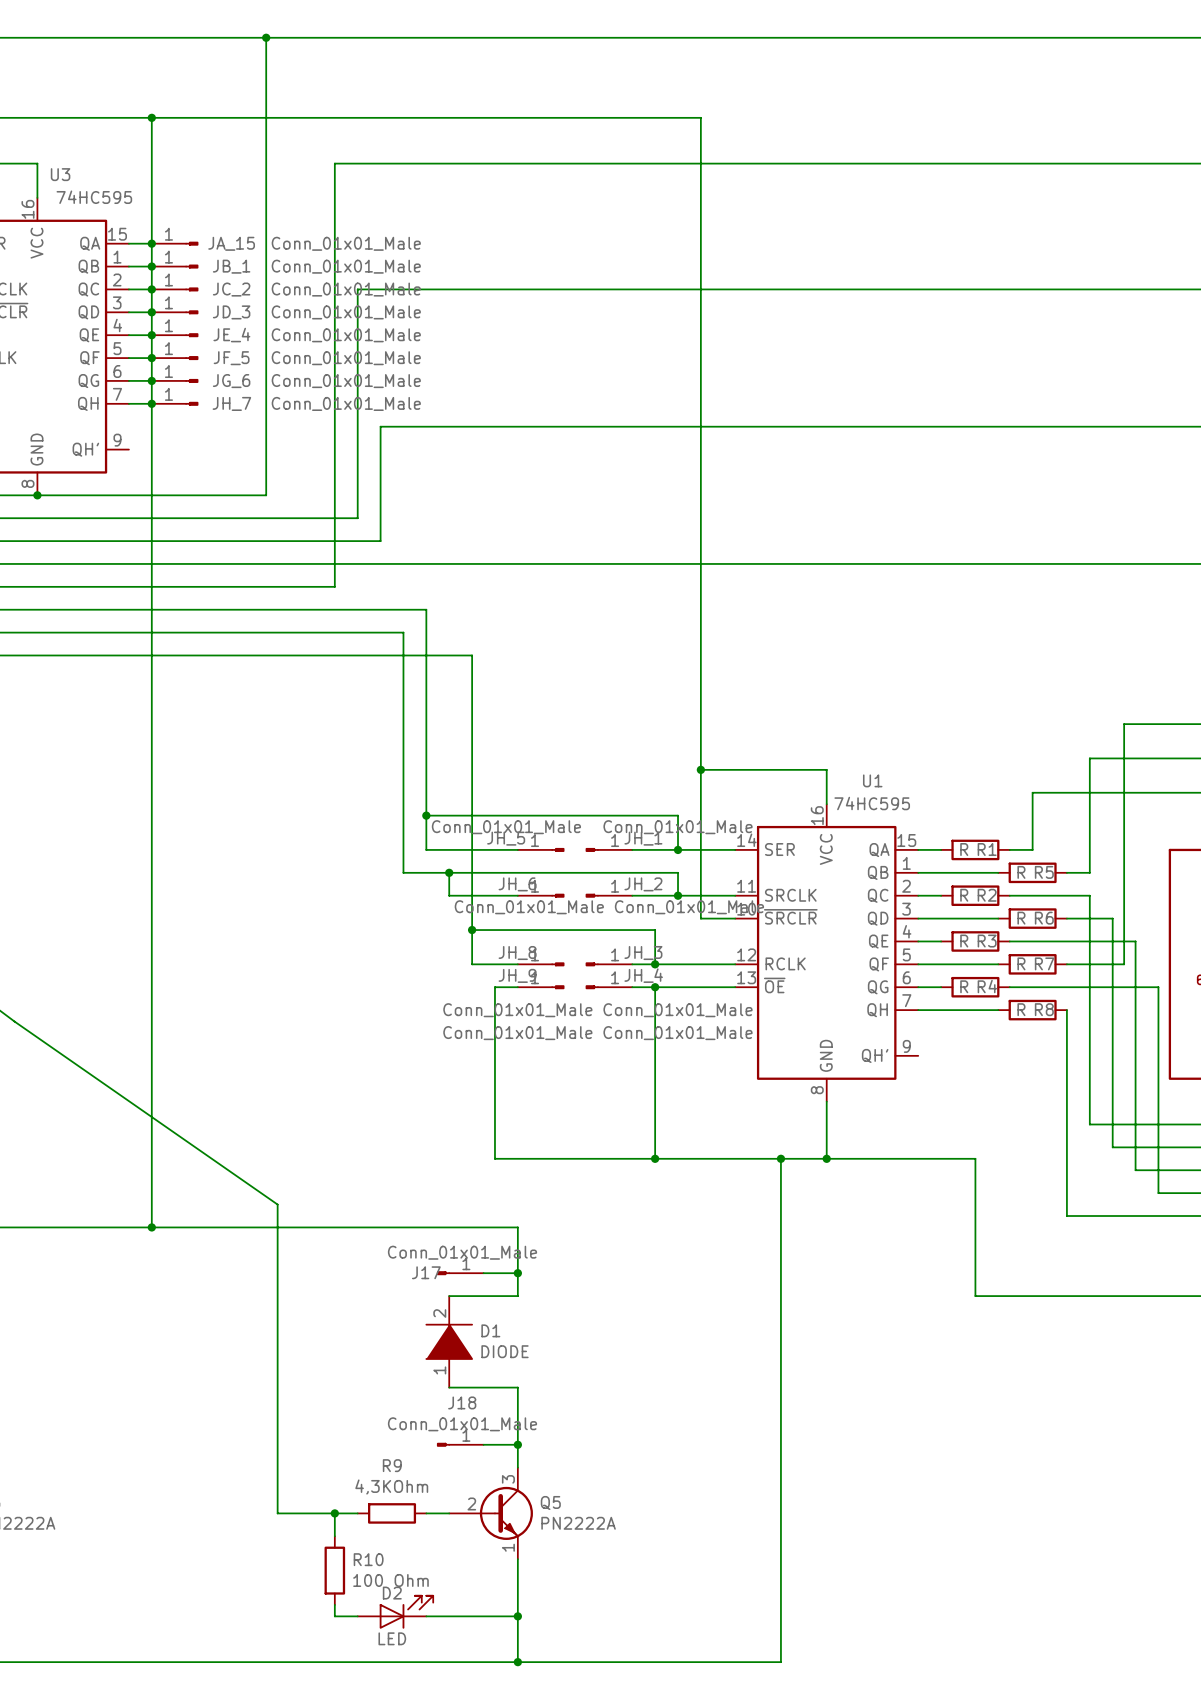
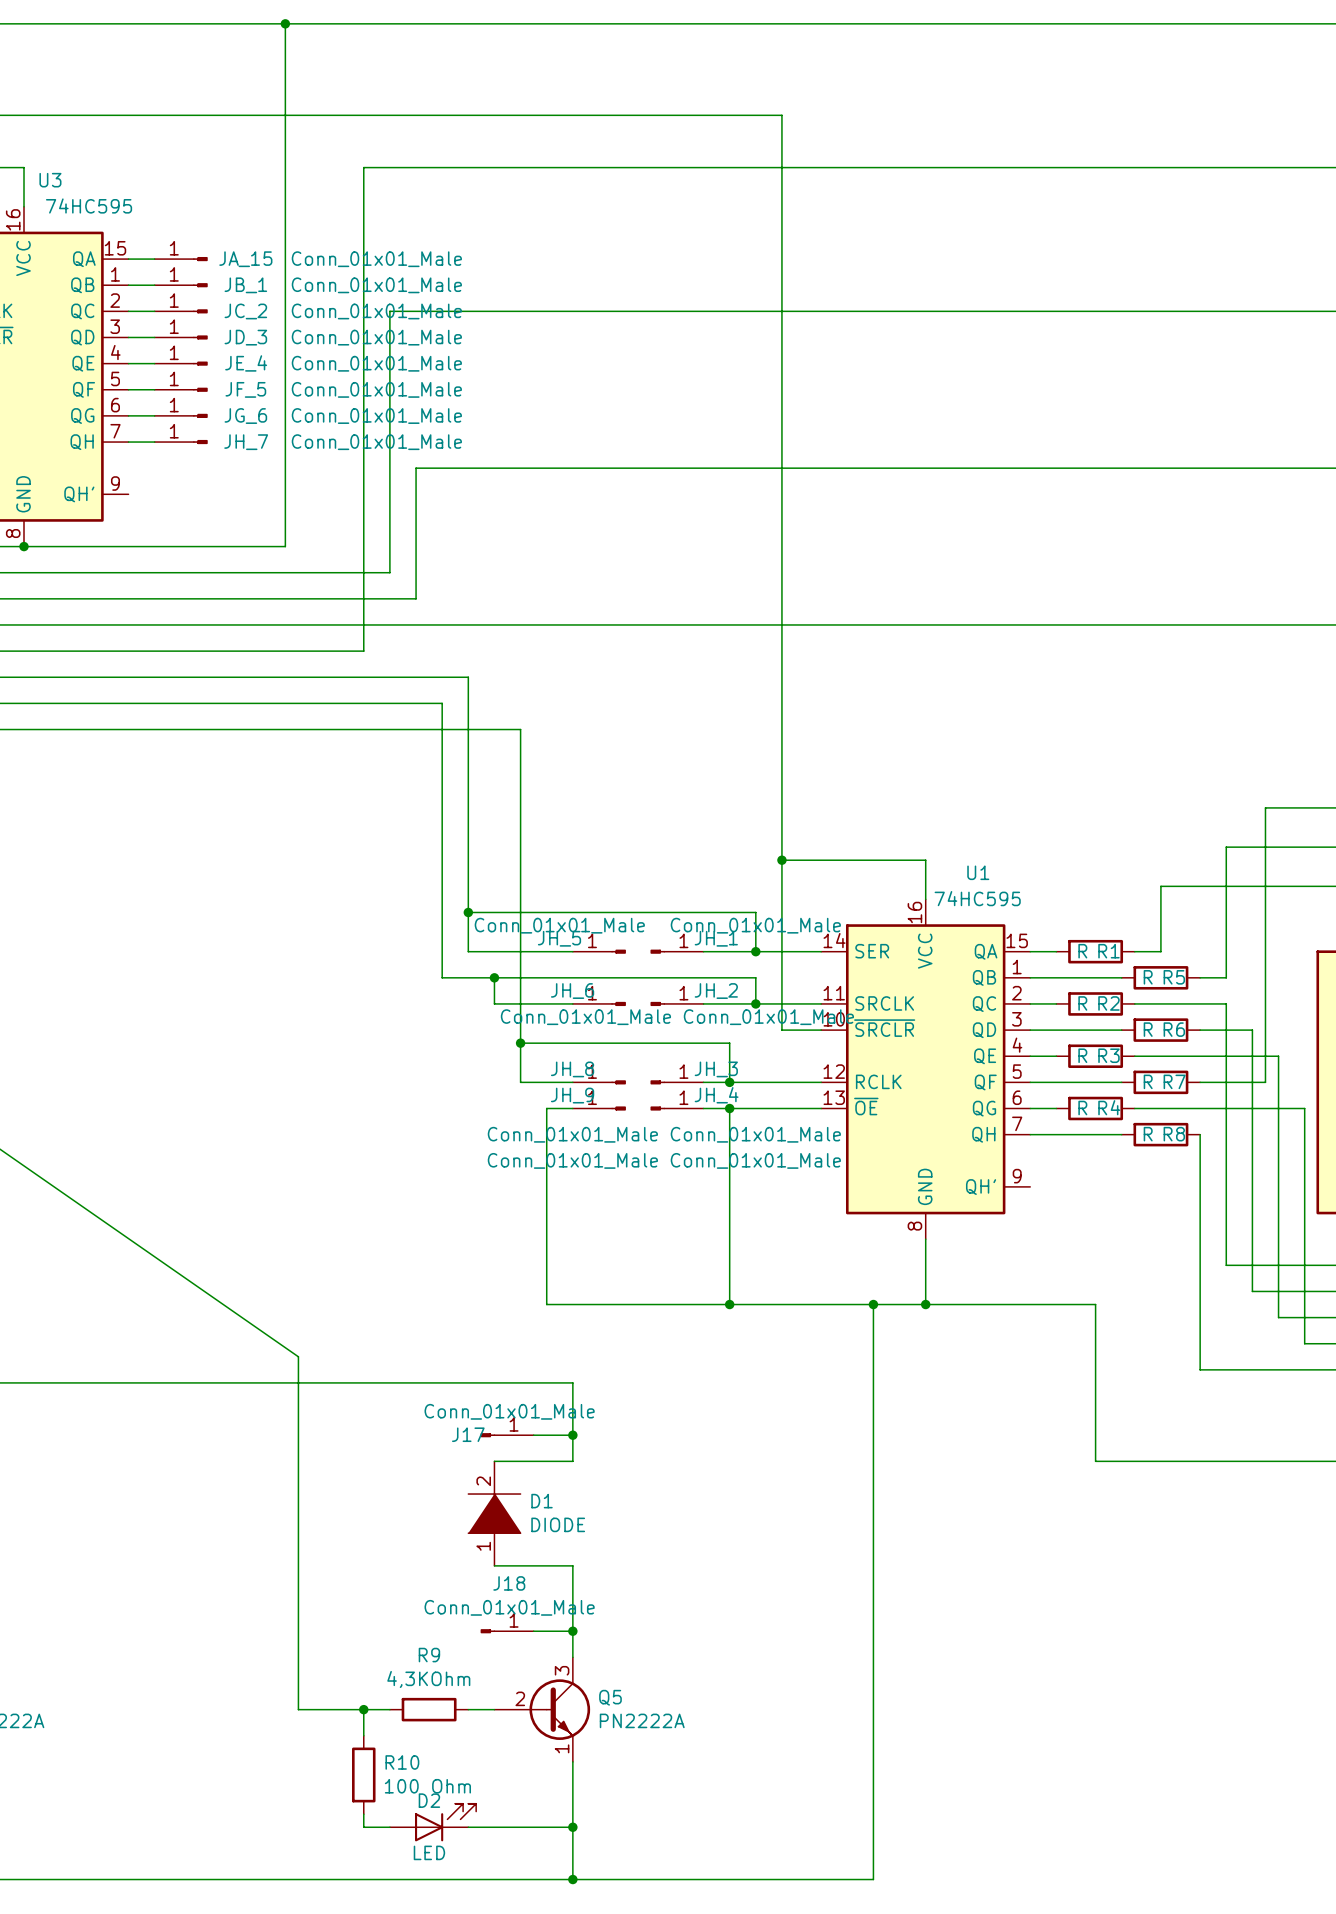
wire: (151, 117) (151, 1227) -> none
junction: (151, 117) -> none
junction: (151, 243) -> none
junction: (151, 266) -> none
junction: (151, 289) -> none
junction: (151, 312) -> none
junction: (151, 335) -> none
junction: (151, 358) -> none
junction: (151, 380) -> none
junction: (151, 403) -> none
junction: (151, 1227) -> none

